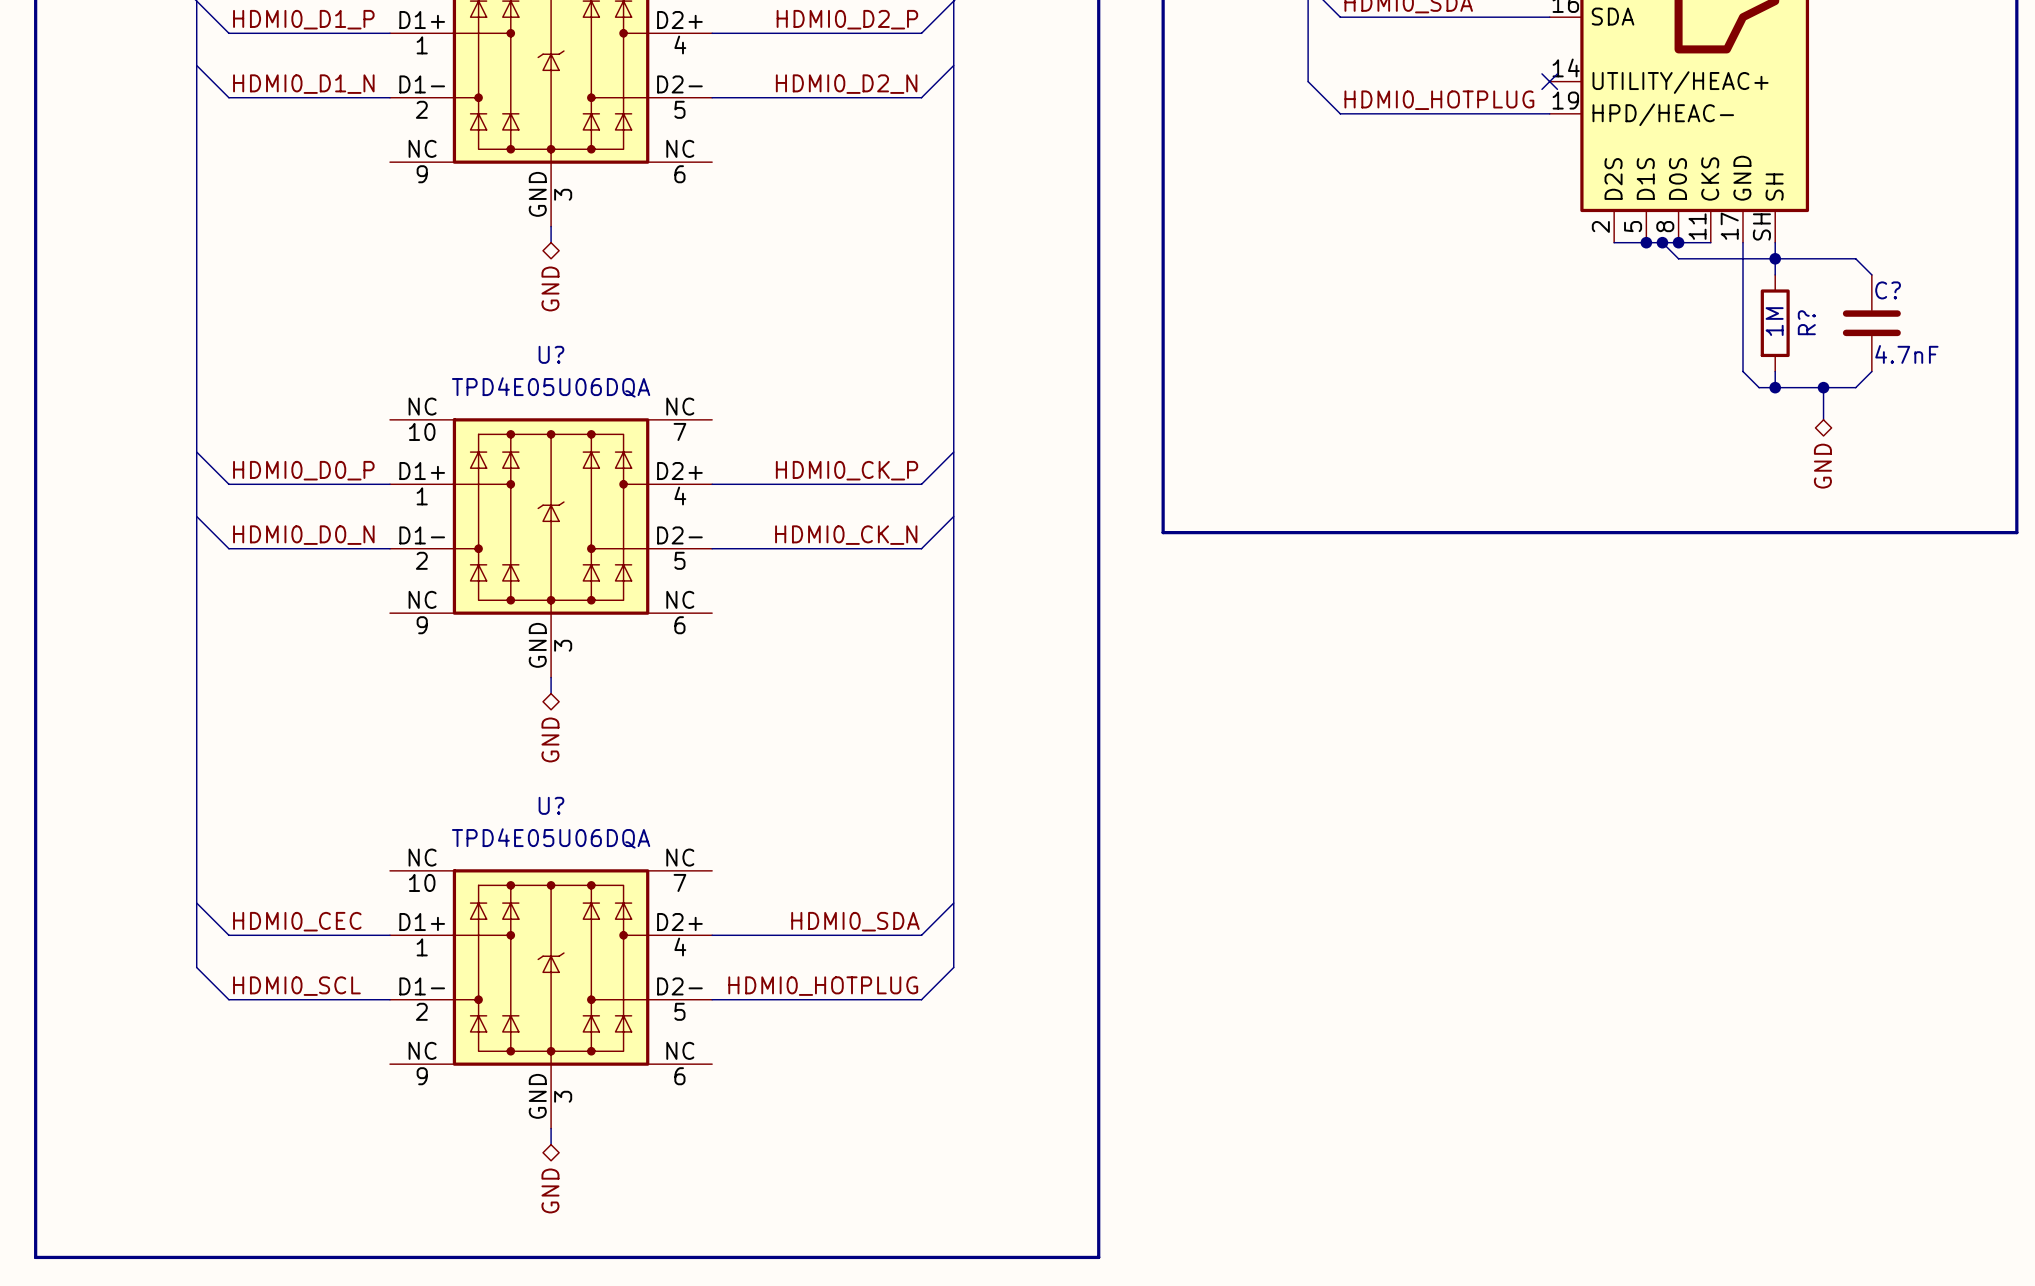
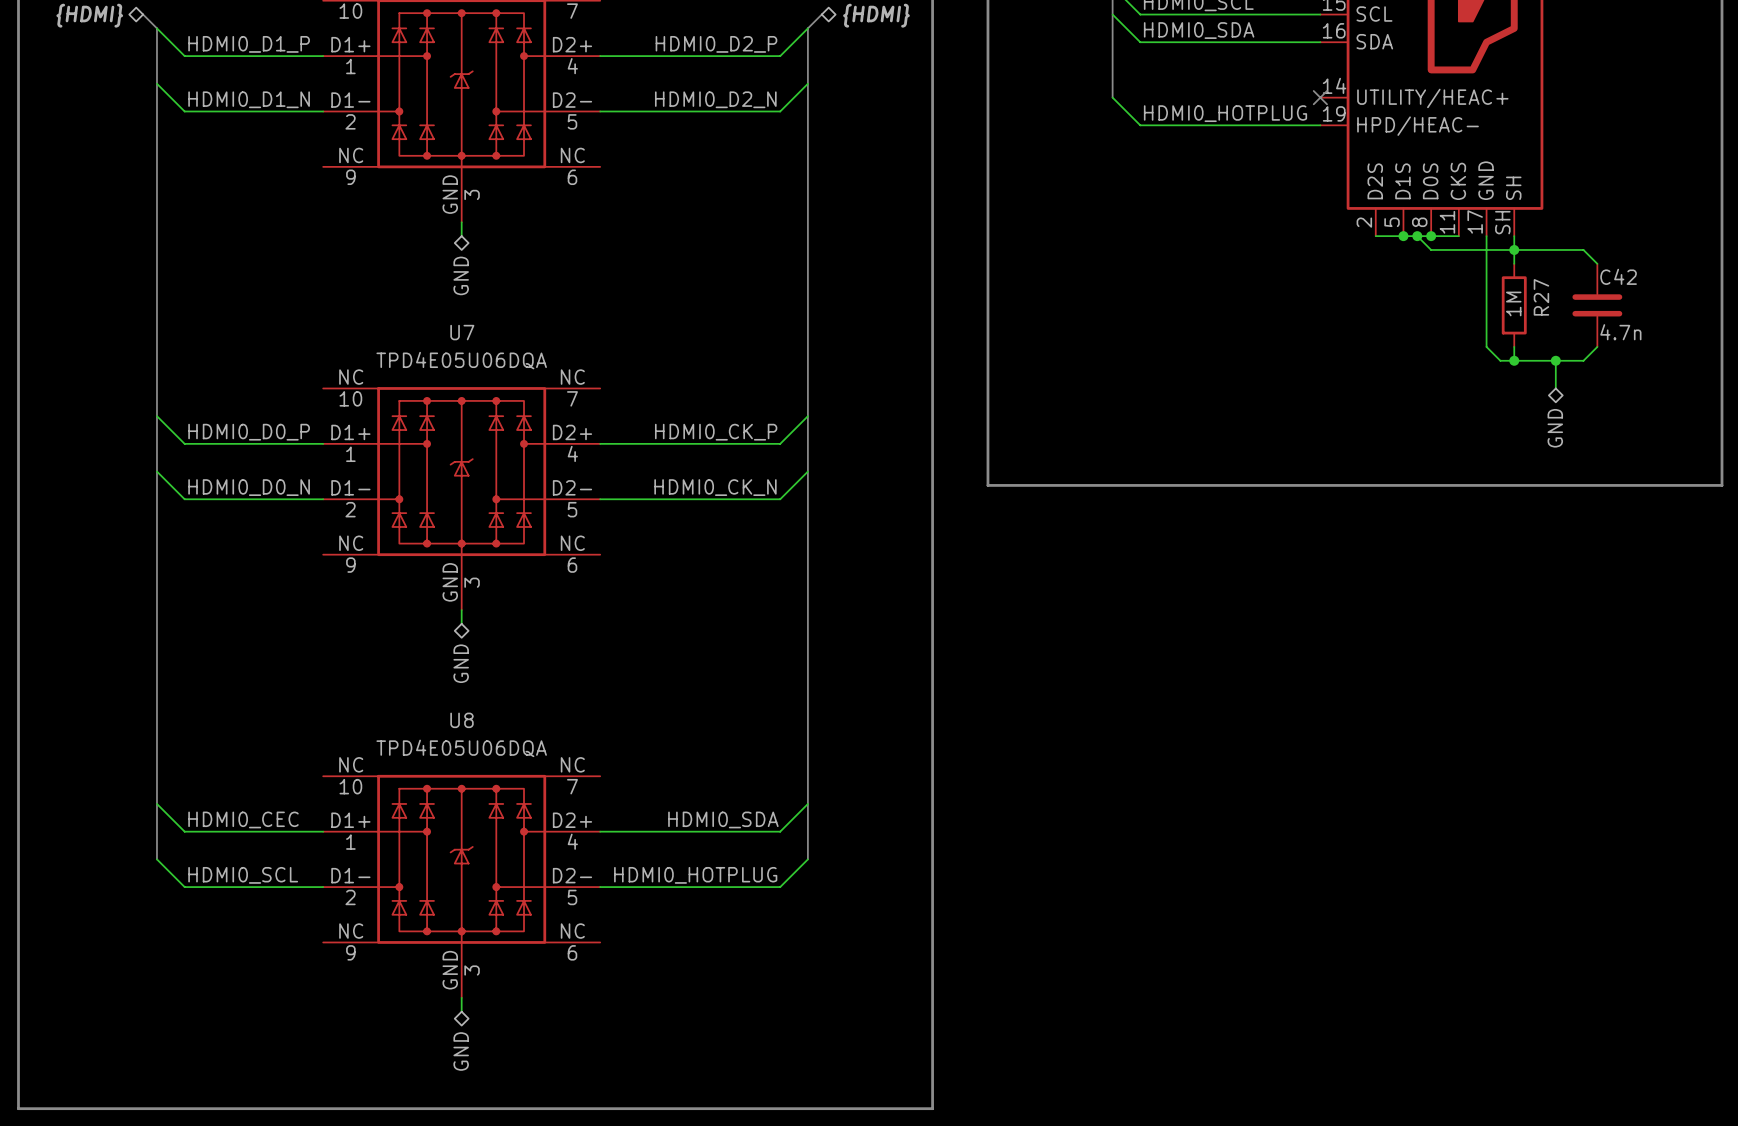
C? name: C? (1888, 290) -> C42 (1618, 276)
R? name: R? (1806, 322) -> R27 (1541, 297)
U? name: U? (551, 354) -> U7 (462, 332)
C? value: 4.7nF (1906, 354) -> 4.7n (1620, 332)
U? name: U? (551, 805) -> U8 (462, 720)

